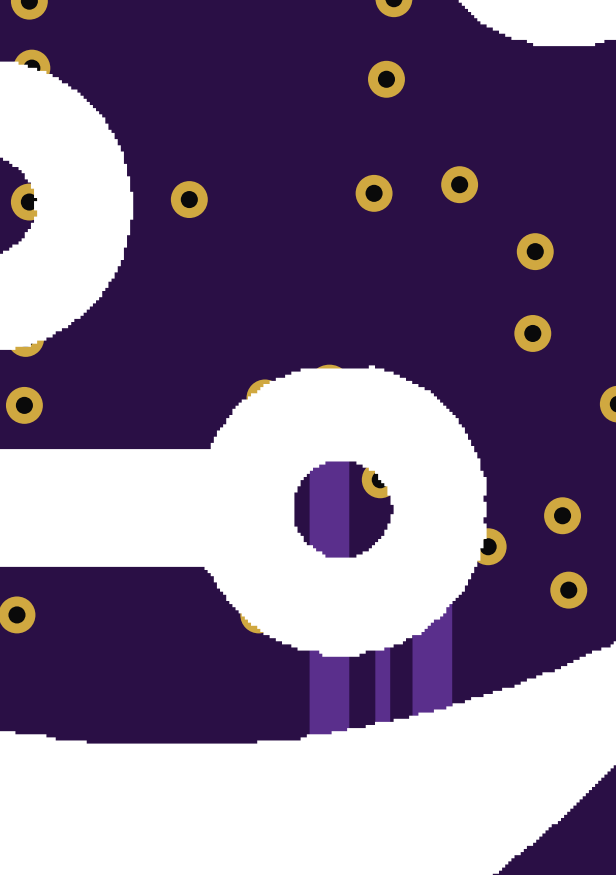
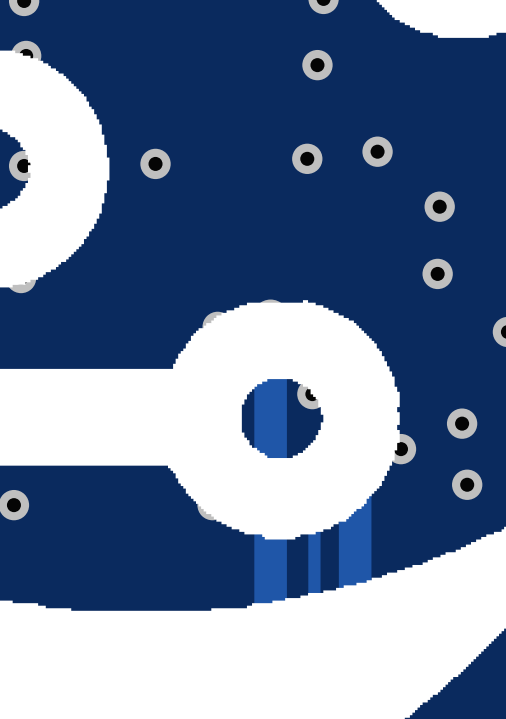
via: (24, 405) -> none

